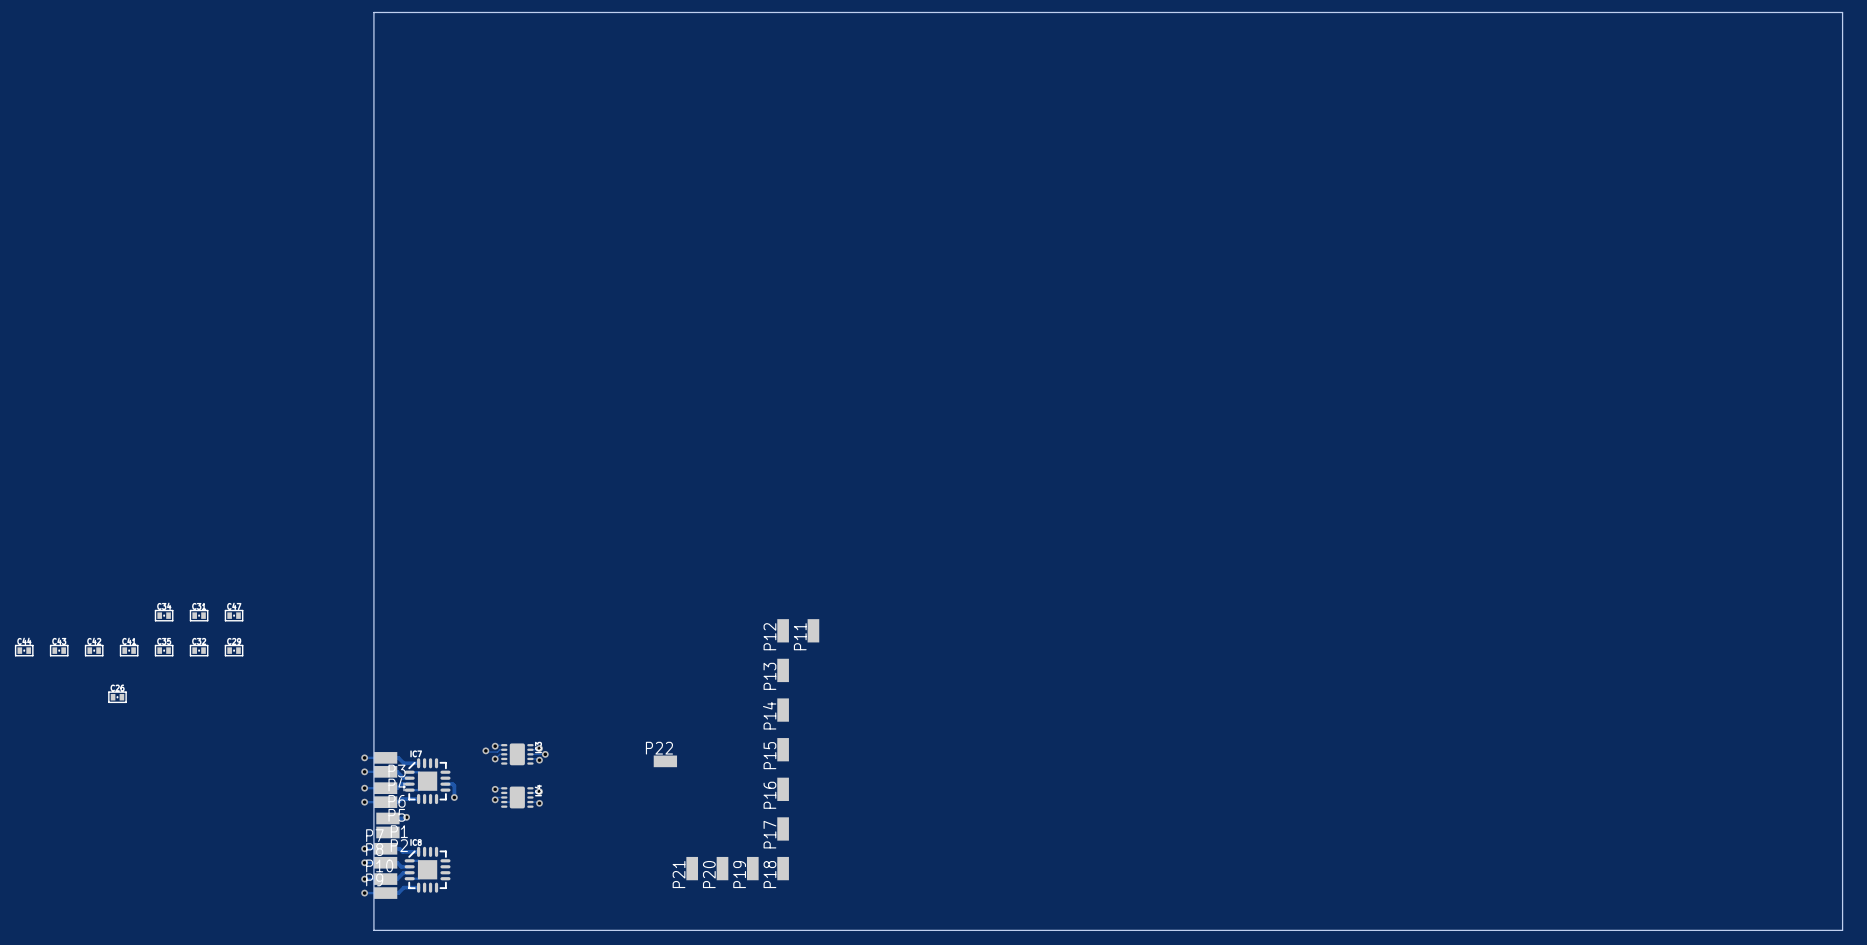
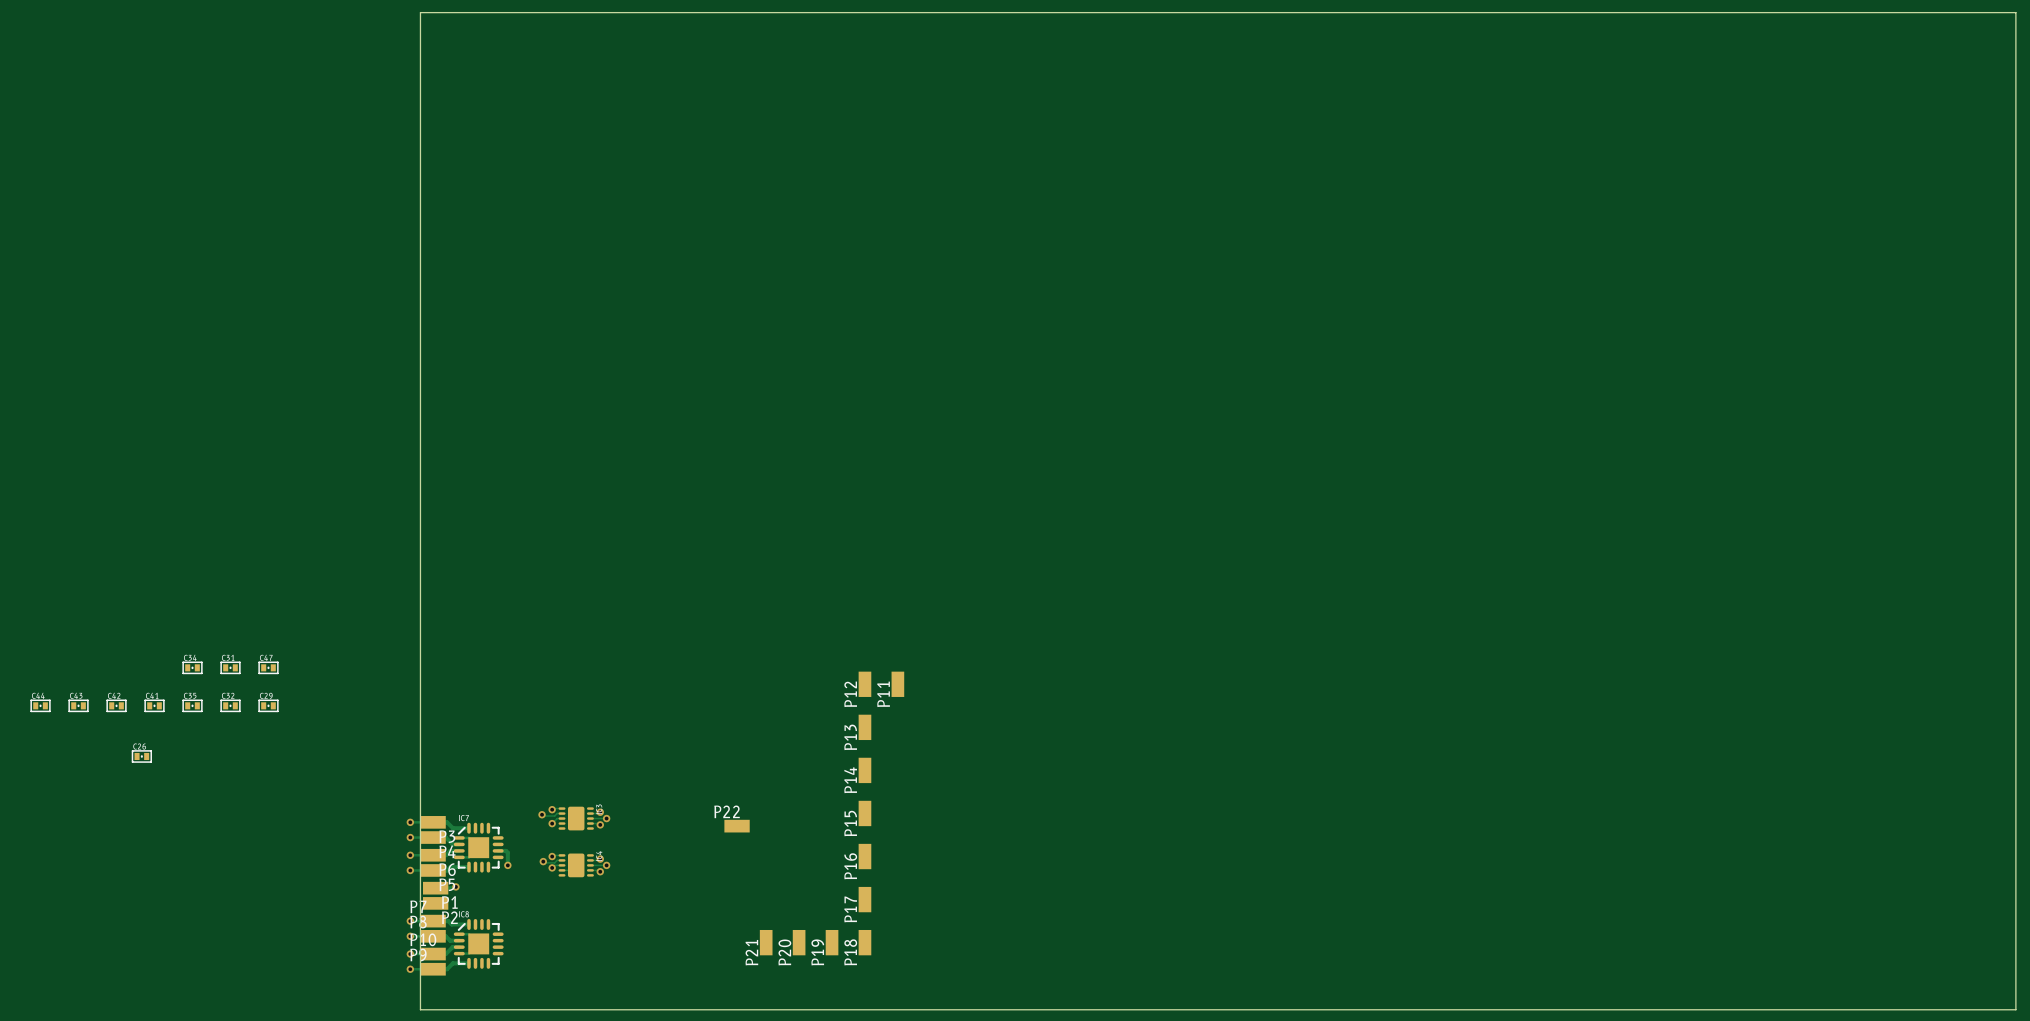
track: none -> (561, 860) (557, 860) (554, 862) (543, 861)
via: none -> (543, 861)
track: none -> (590, 865) (606, 865)
via: none -> (606, 865)

